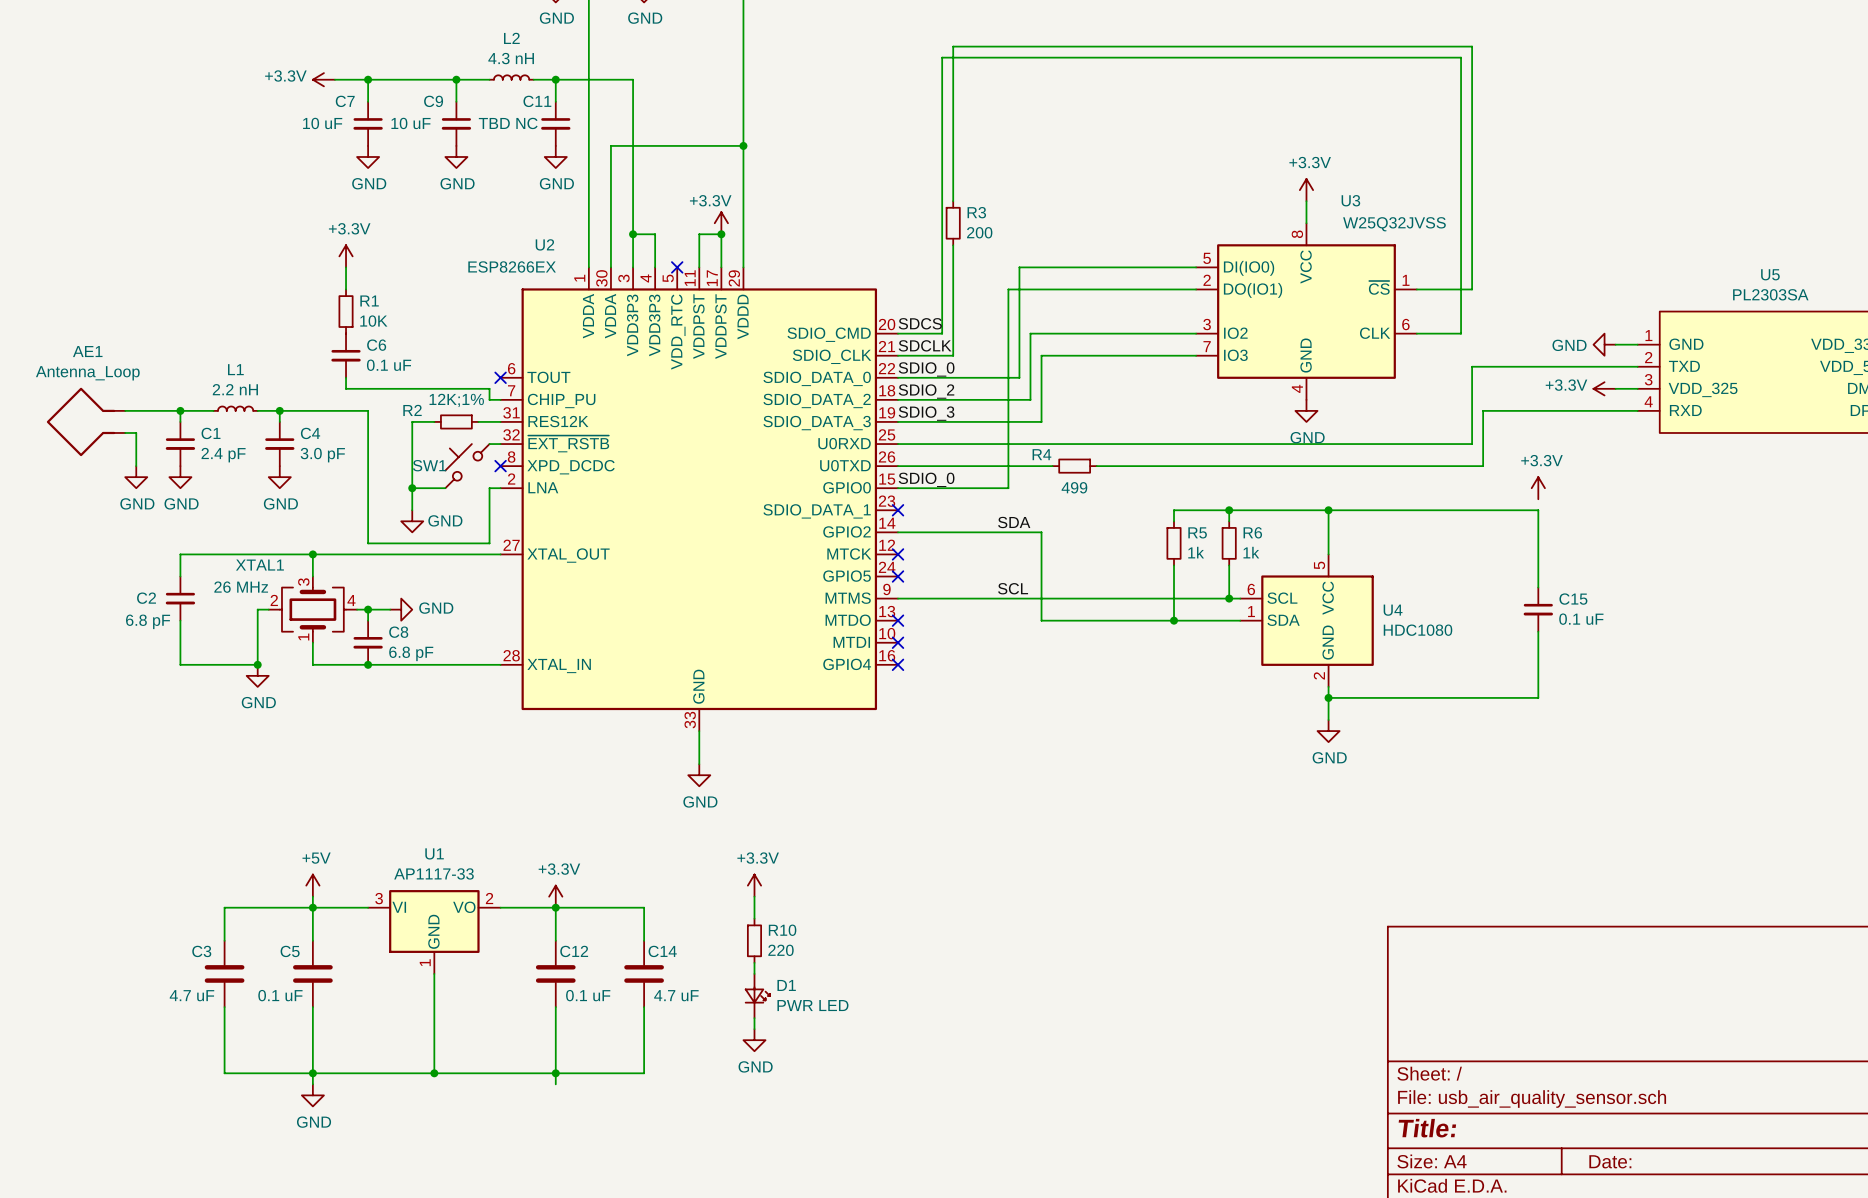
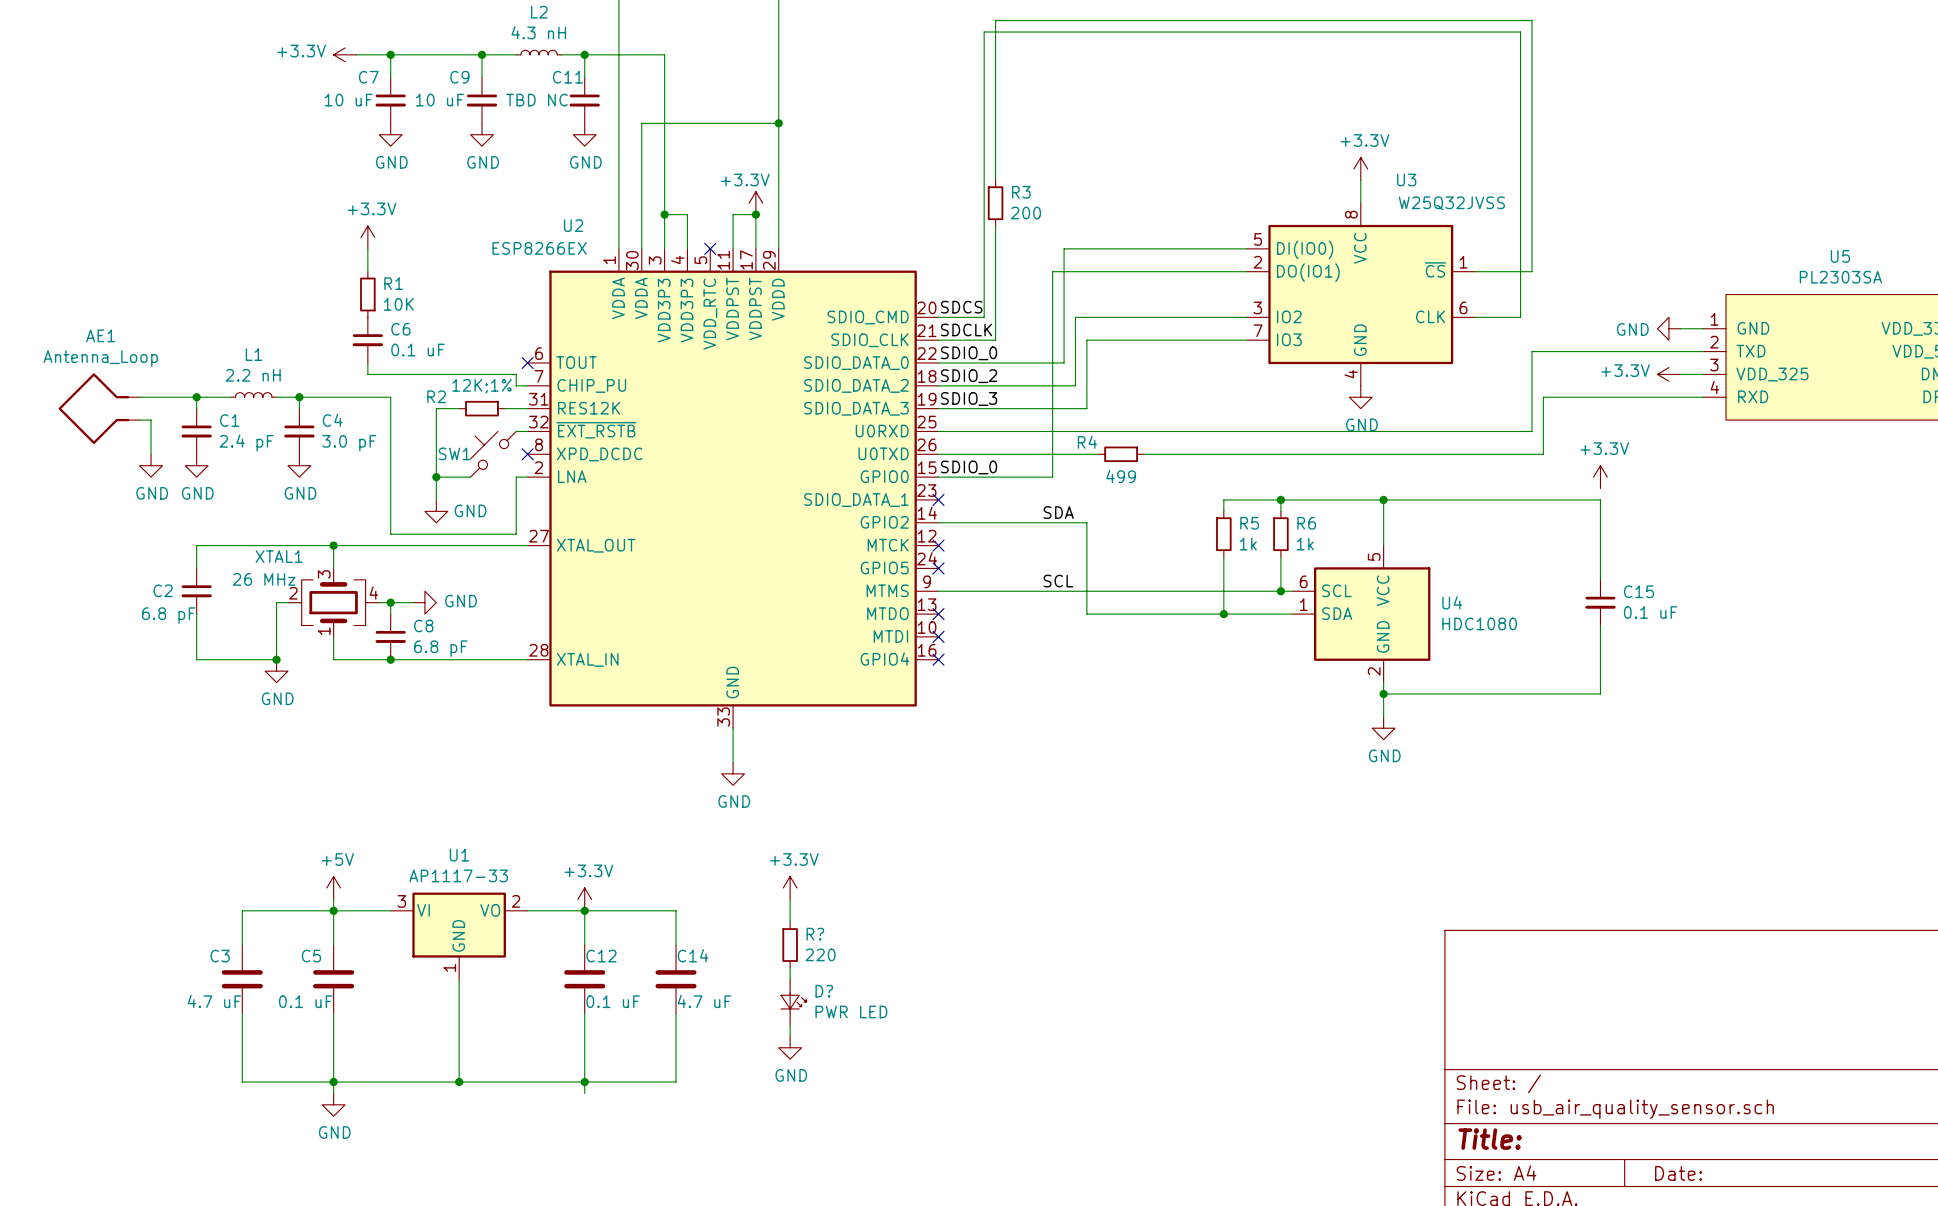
R10 name: R10 (782, 930) -> R? (815, 934)
D1 name: D1 (786, 985) -> D? (824, 991)

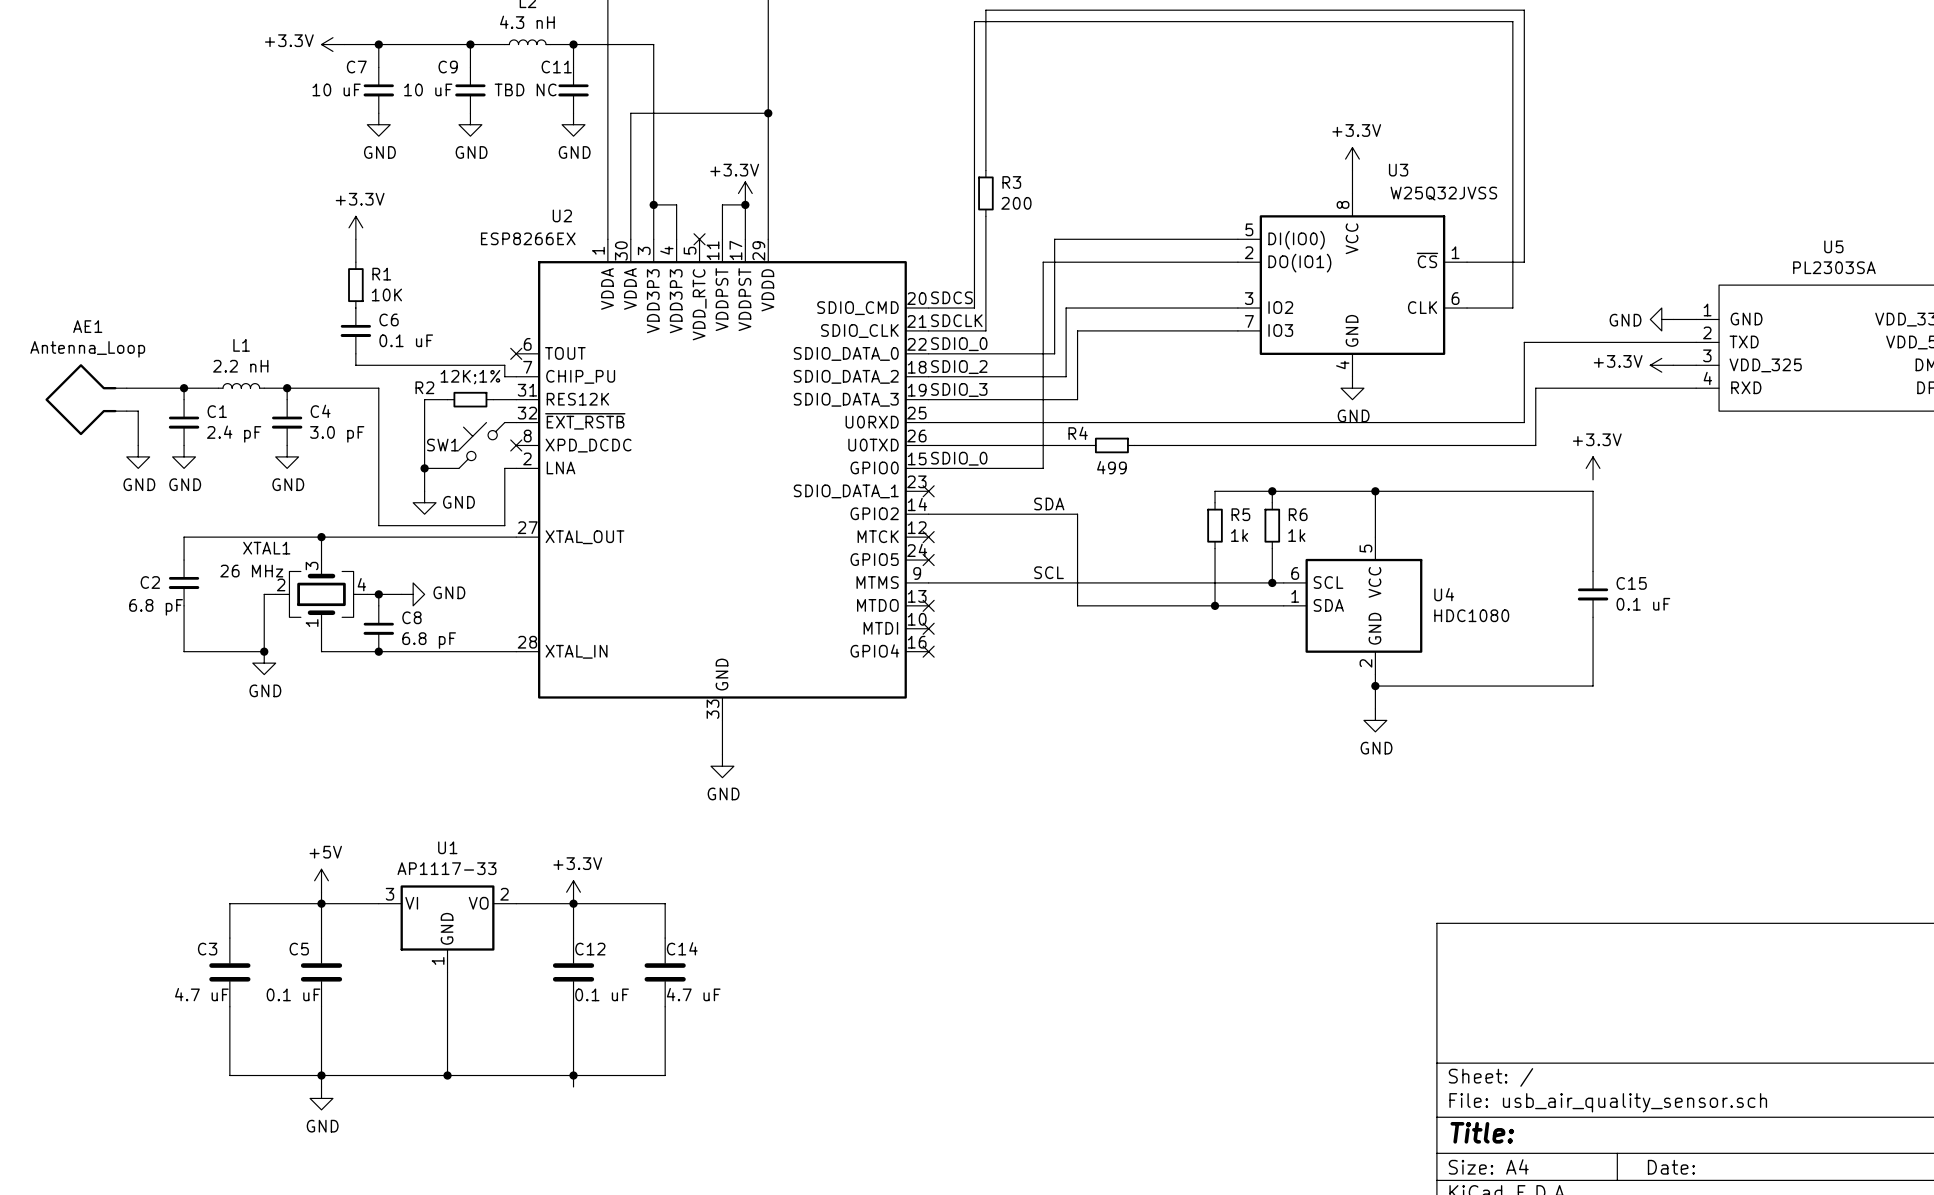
power symbol: +3.3V (790, 887) -> none
wire: (790, 899) (790, 922) -> none
R?: 220 (790, 945) -> none
wire: (790, 967) (790, 979) -> none
D?: PWR LED (793, 1002) -> none
wire: (790, 1024) (790, 1036) -> none
power symbol: GND (790, 1047) -> none

